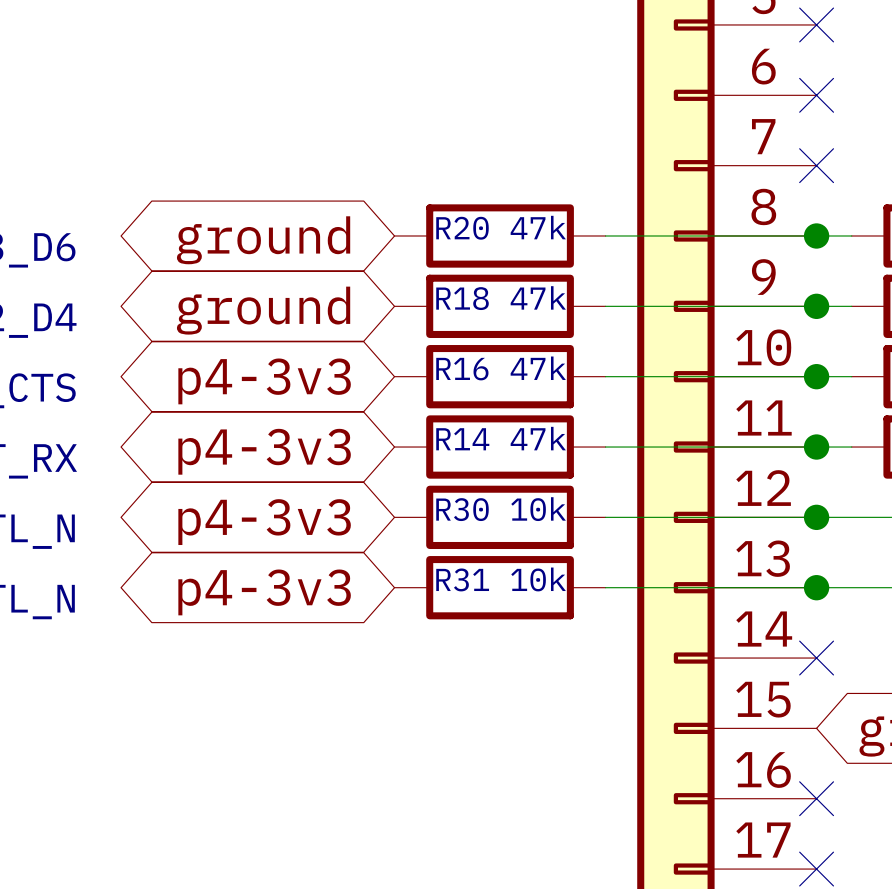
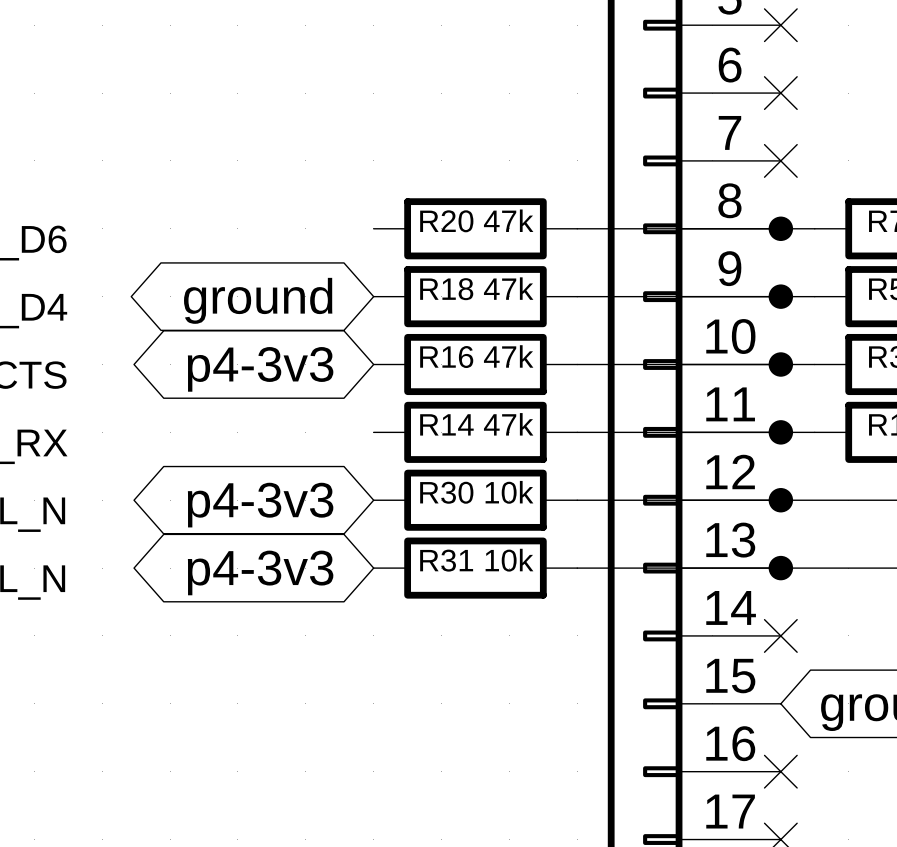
global label: ground (263, 240) -> none
global label: p4-3v3 (264, 451) -> none

